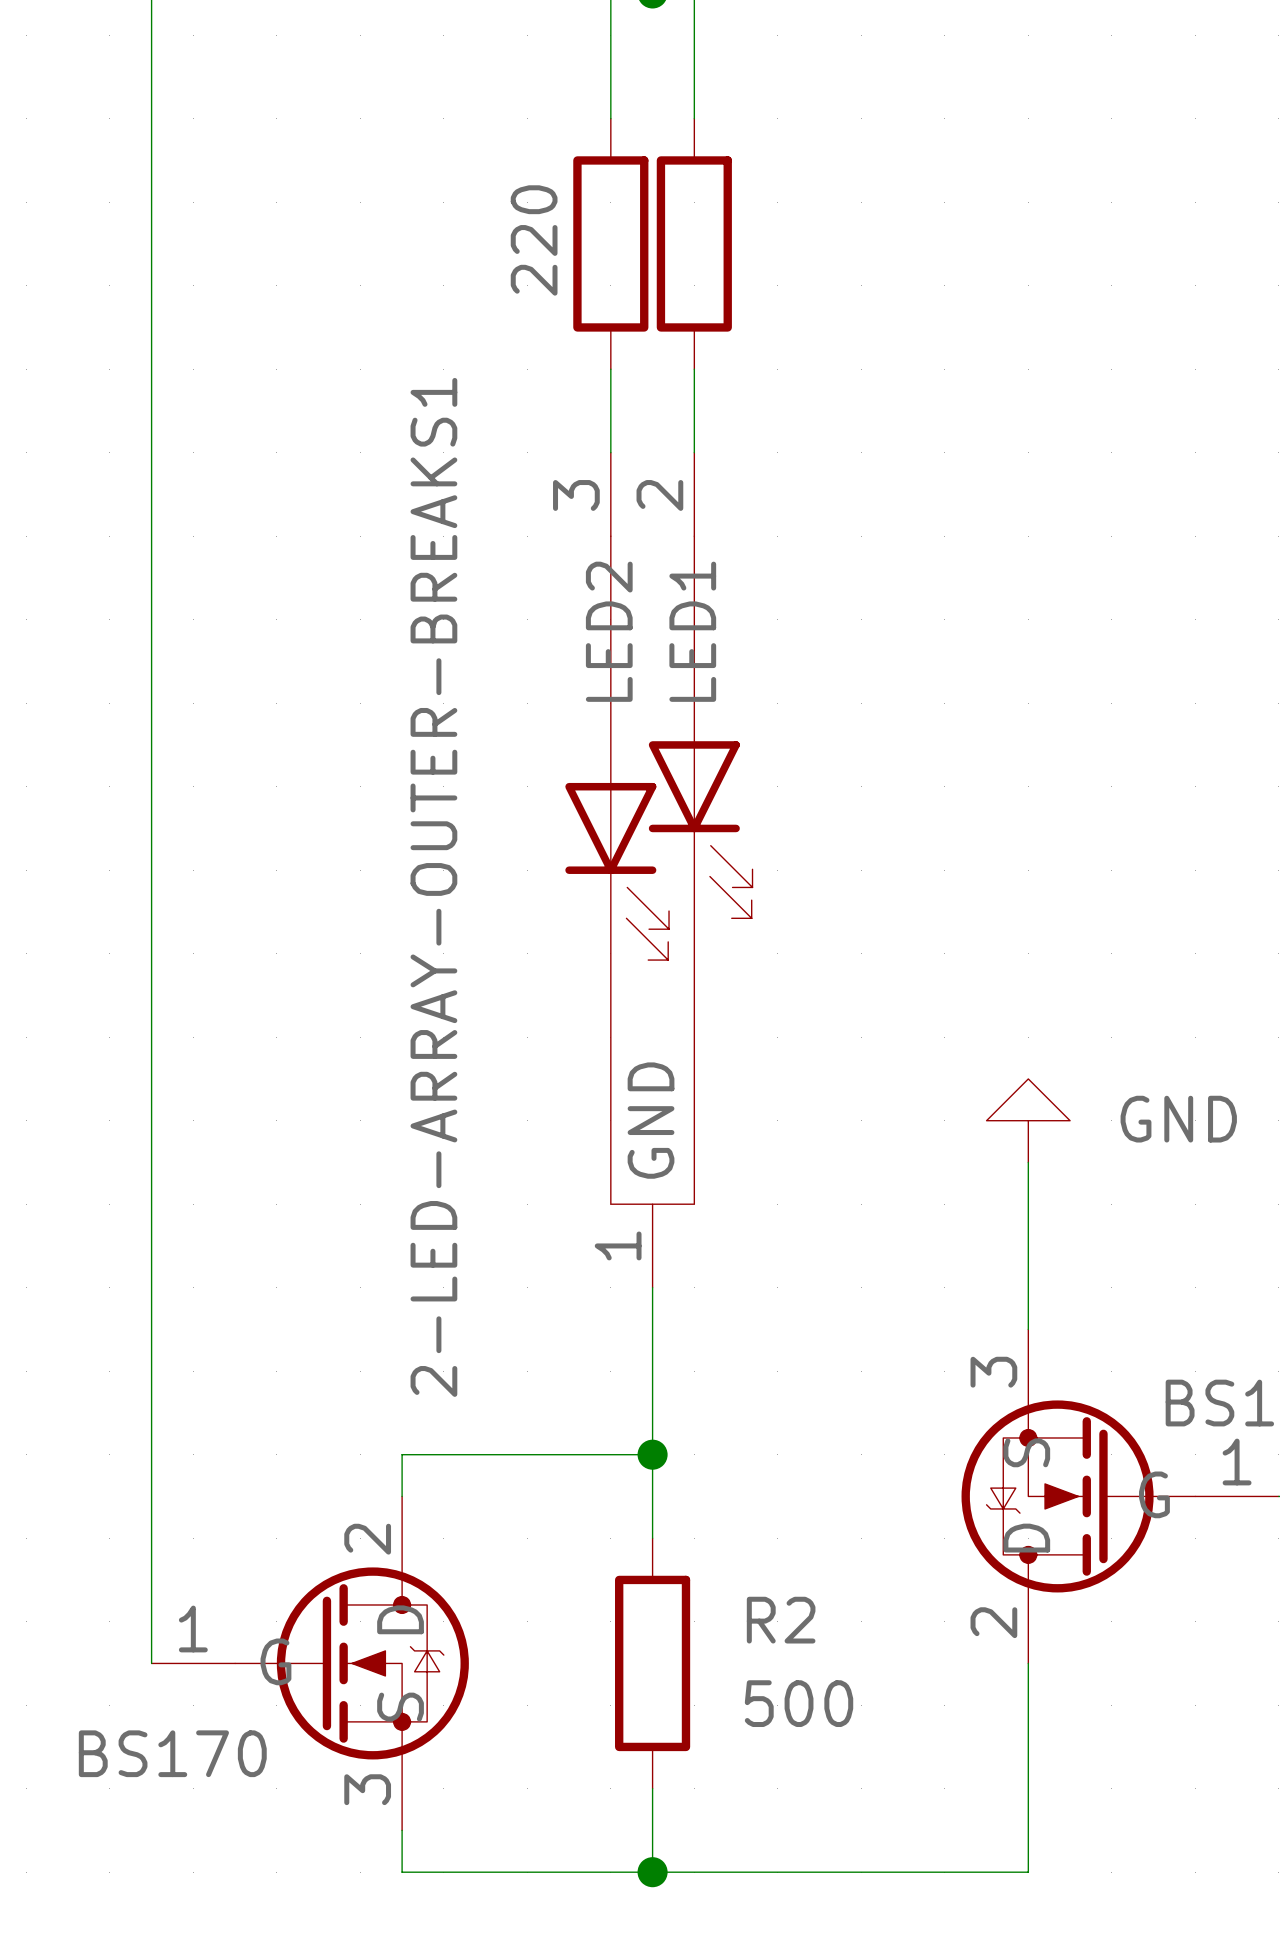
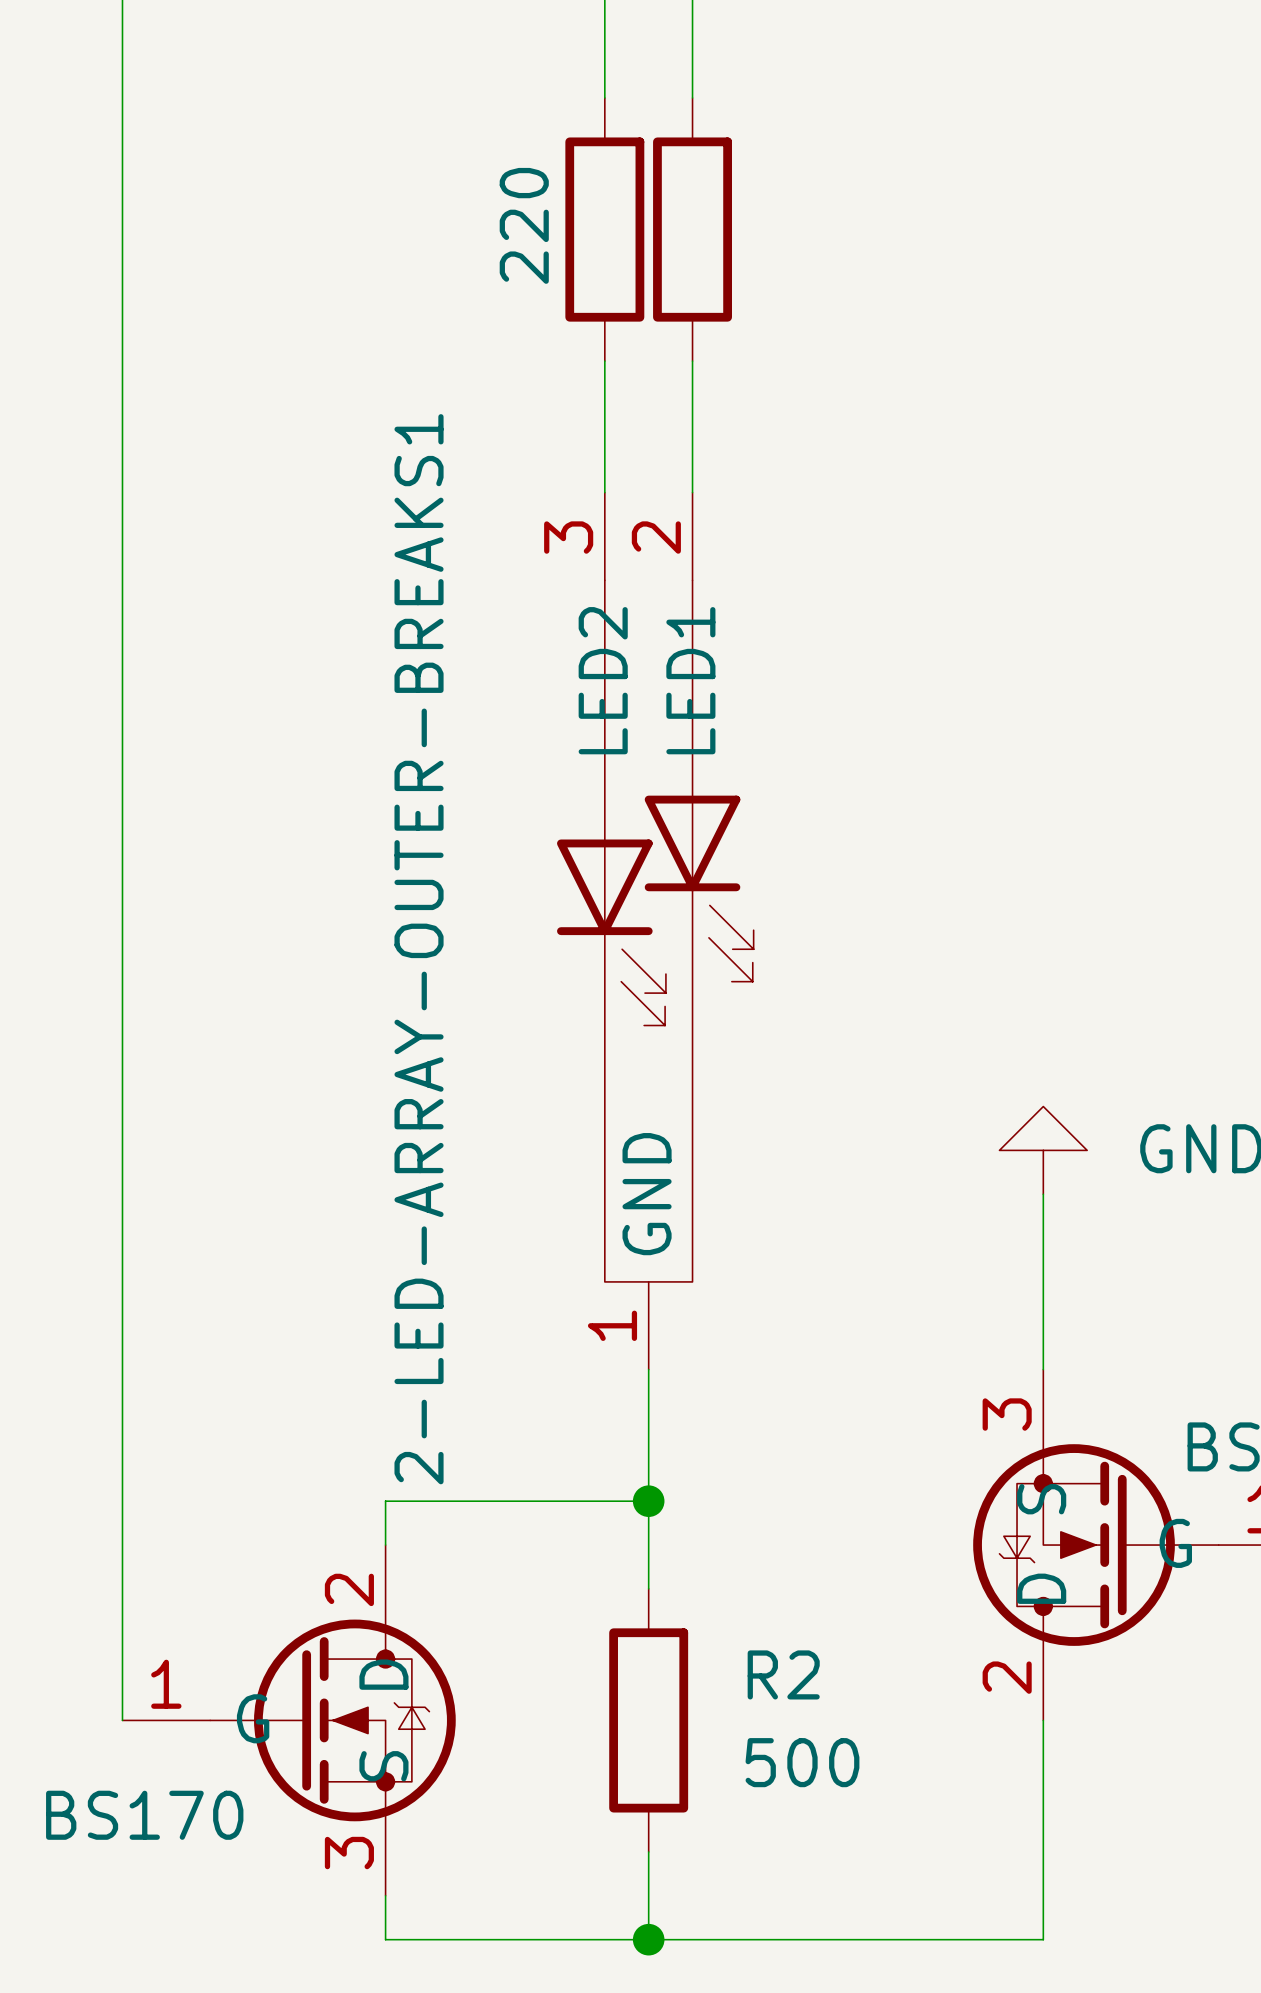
2-LED-ARRAY-OUTER-BREAKS1 position: (658, 870) -> (655, 931)

